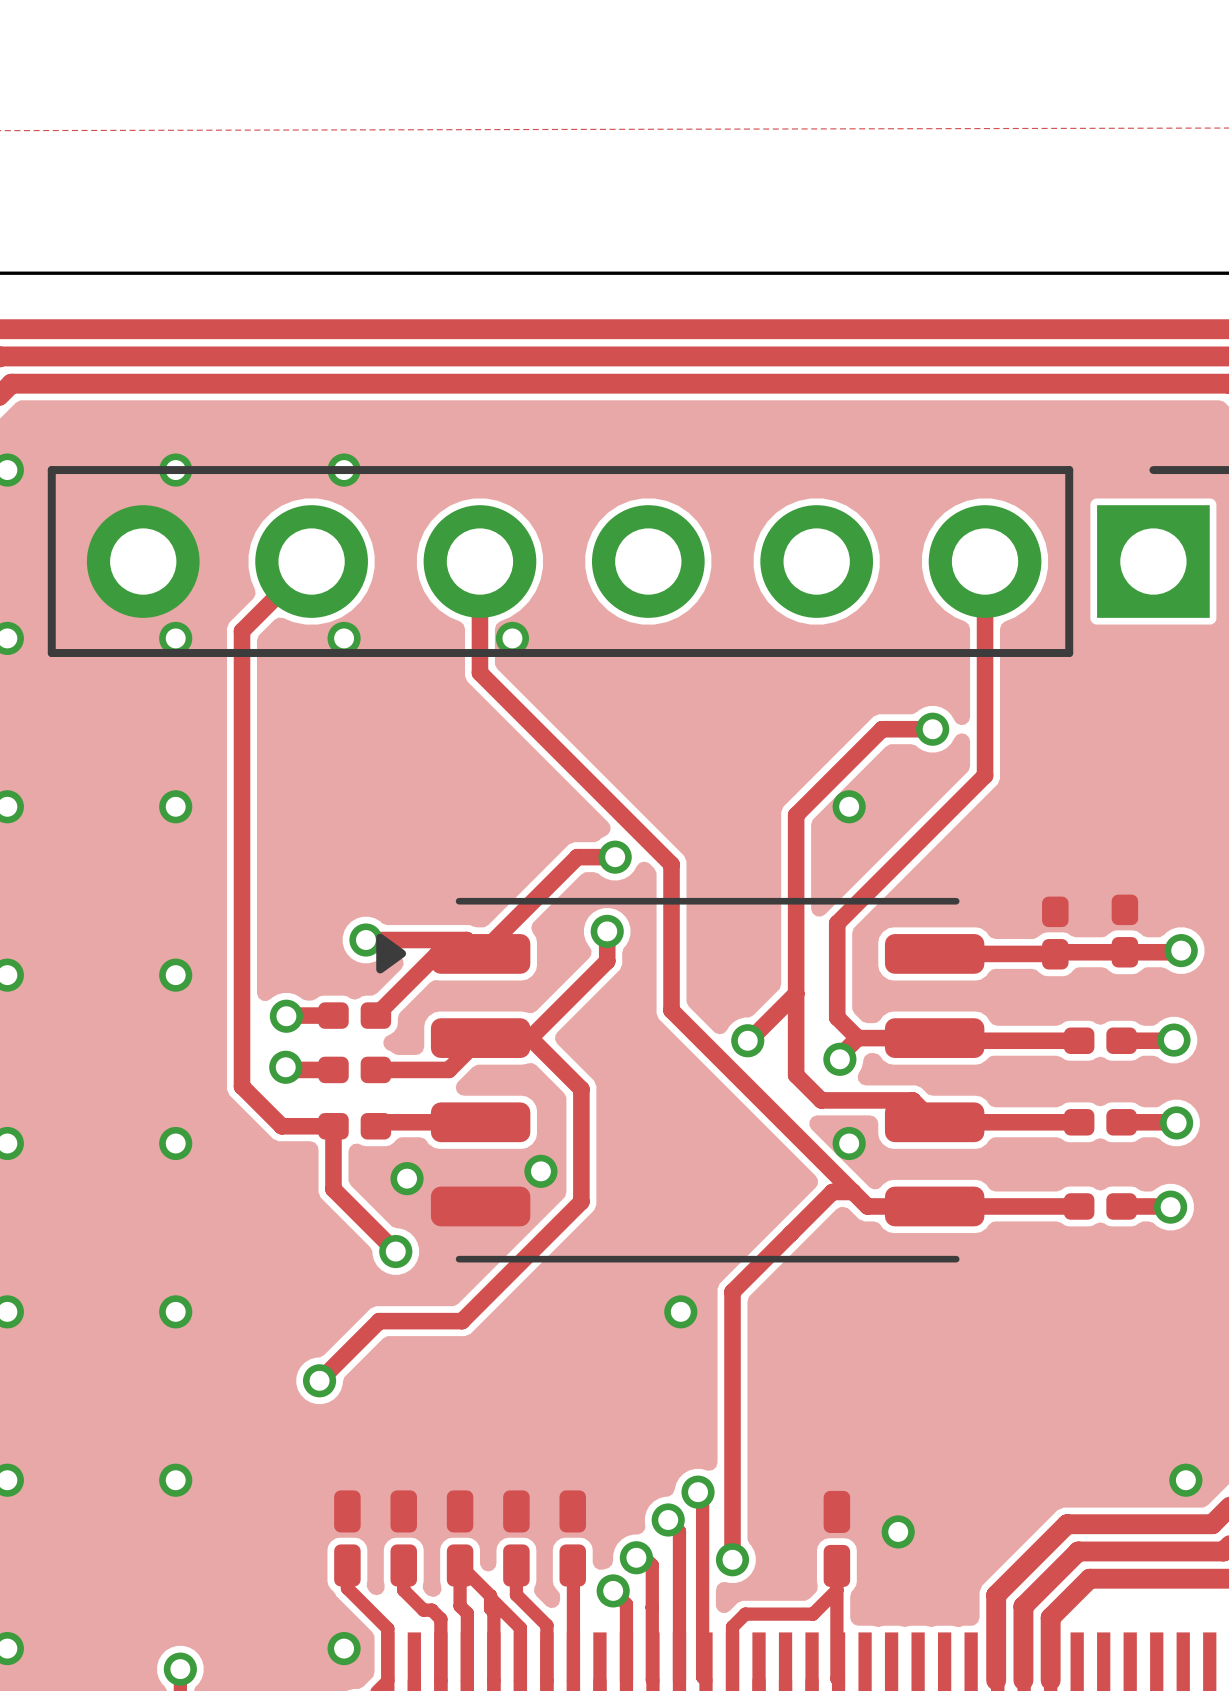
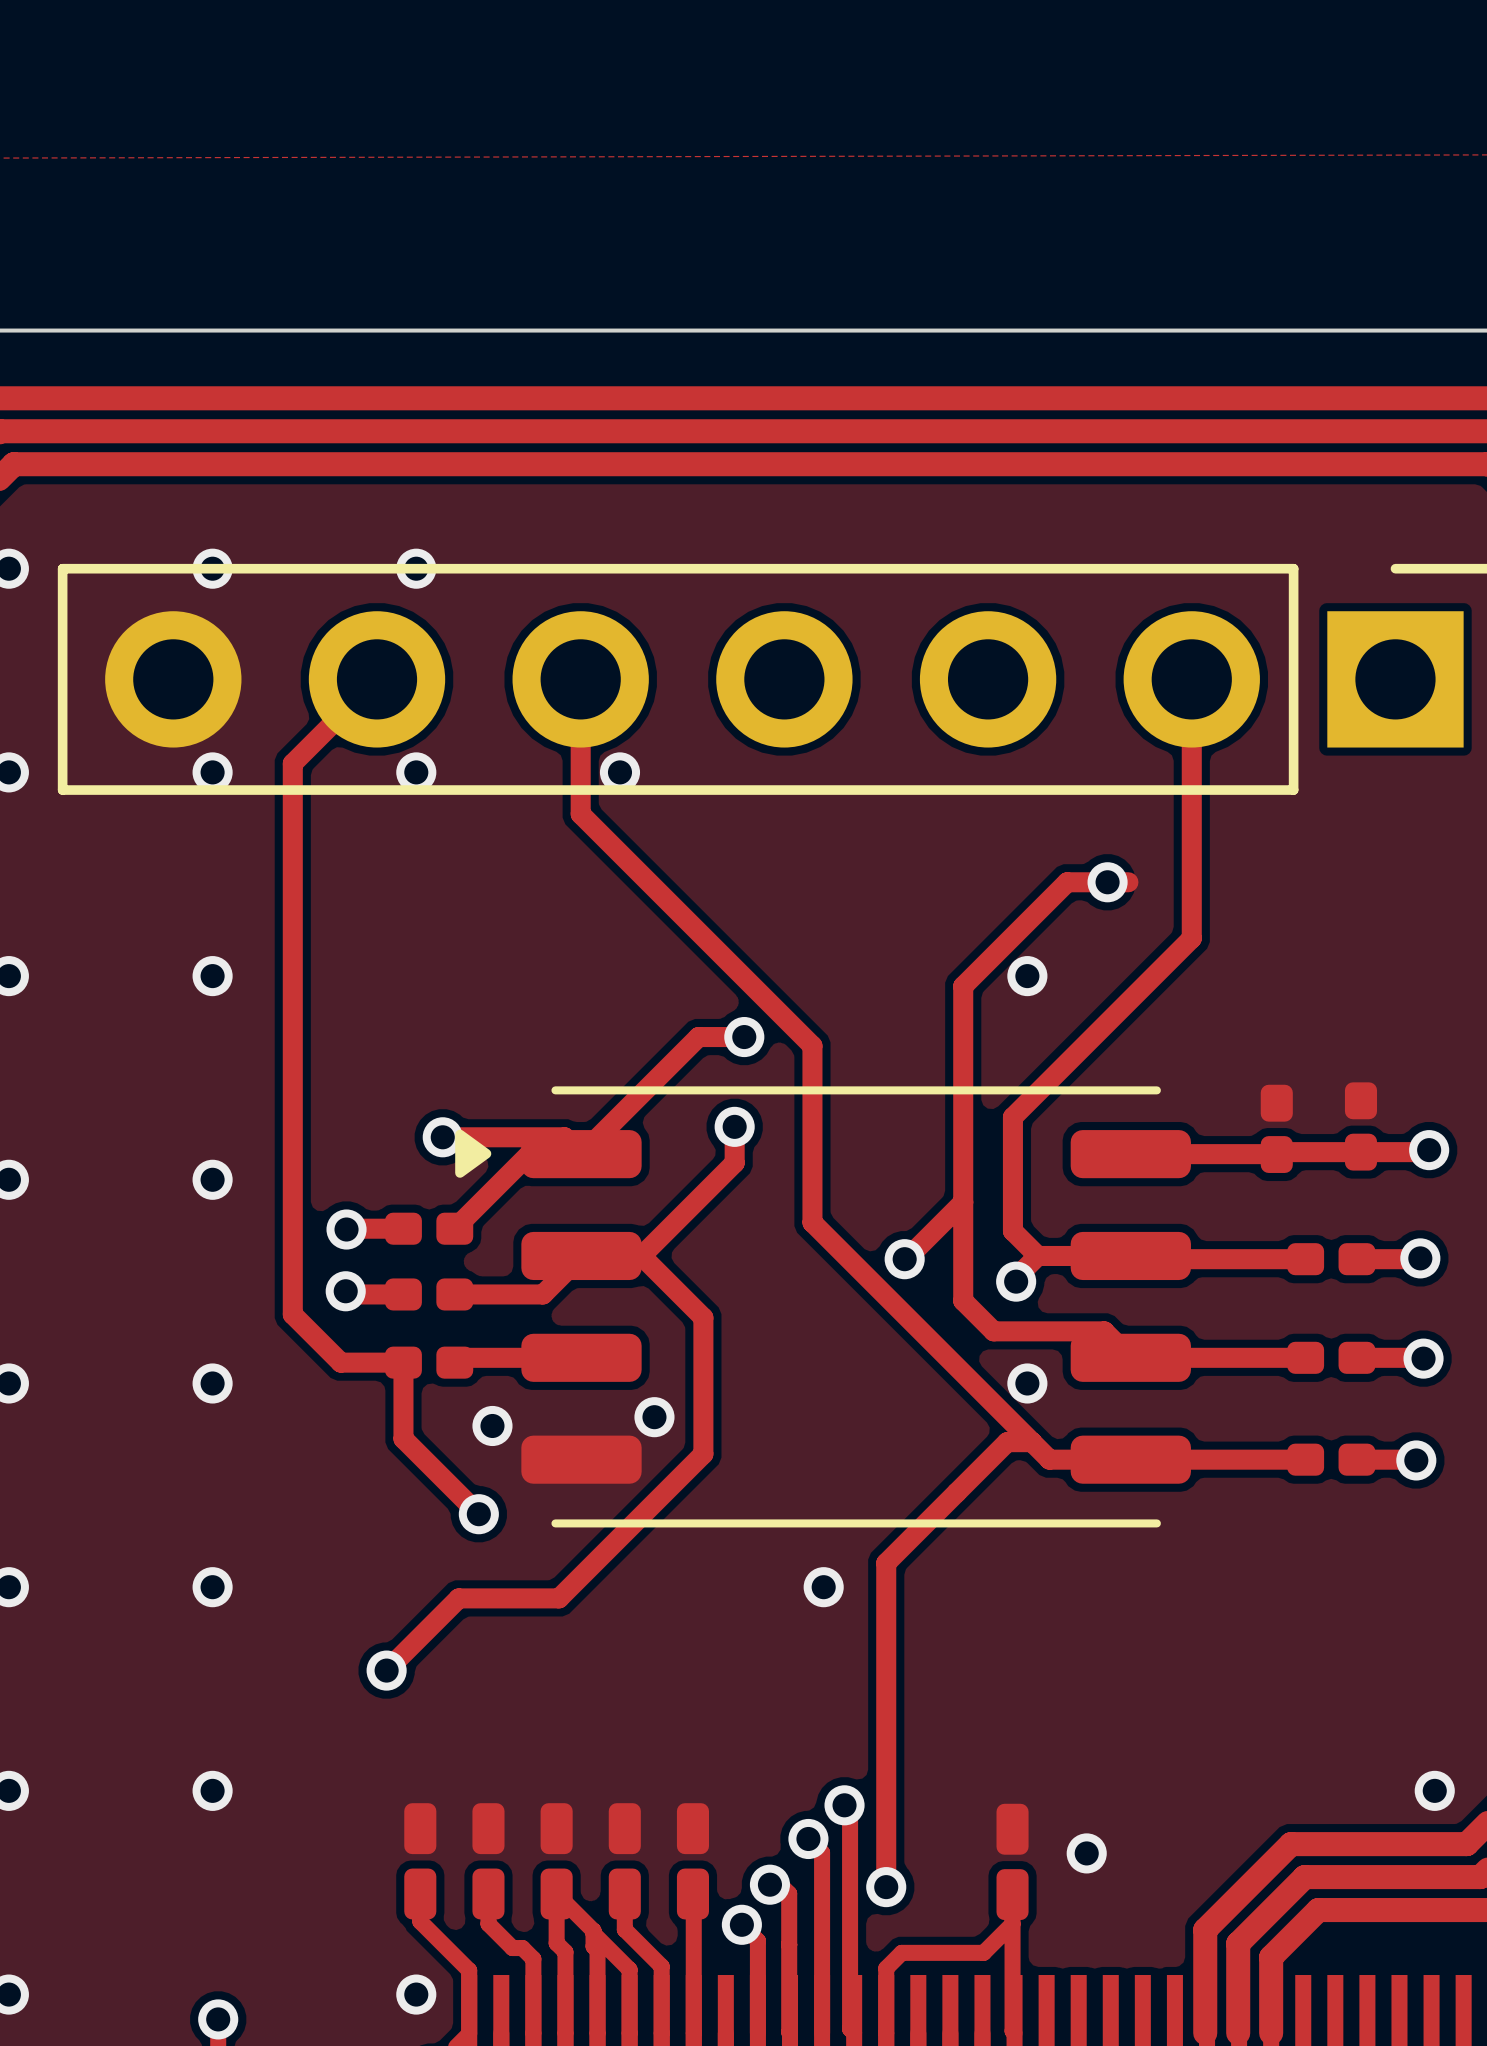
via position: (932, 729) -> (1107, 882)

